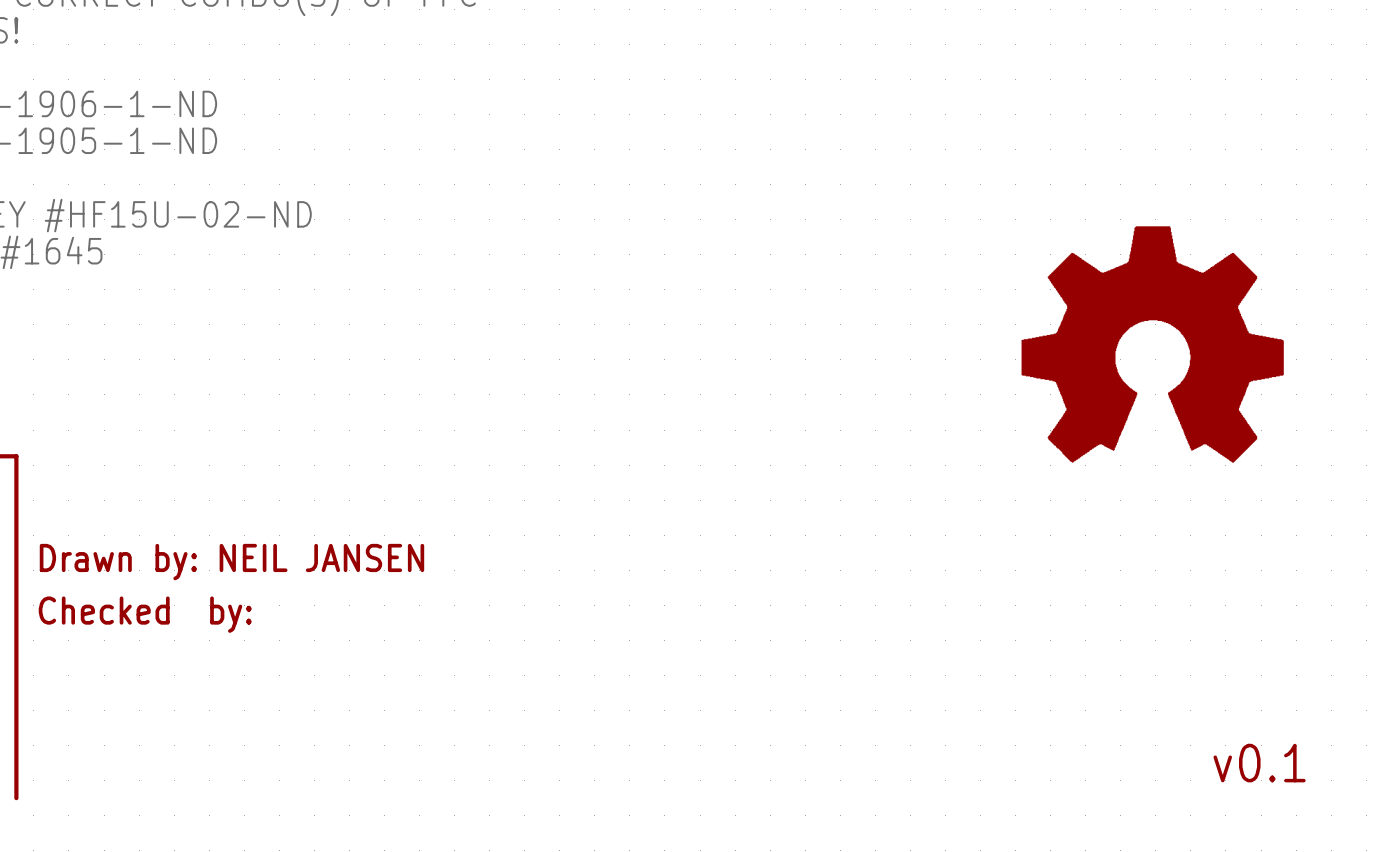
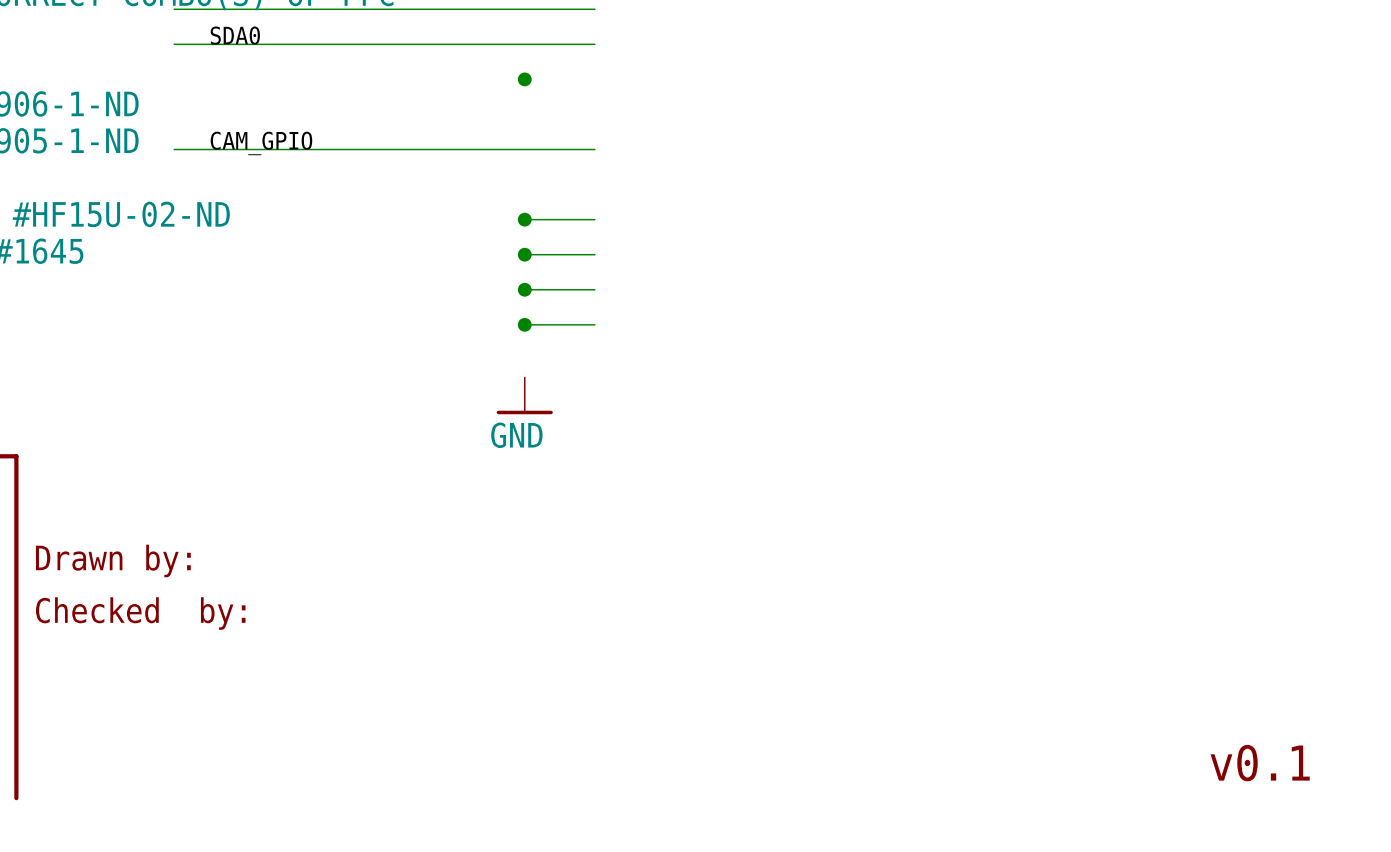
wire: none -> (174, 9) (594, 9)
label: none -> SDA0 (235, 35)
wire: none -> (174, 44) (594, 44)
junction: none -> (524, 79)
label: none -> CAM_GPIO (261, 143)
wire: none -> (174, 149) (594, 149)
wire: none -> (524, 219) (594, 219)
junction: none -> (524, 219)
wire: none -> (524, 254) (594, 254)
junction: none -> (524, 254)
wire: none -> (524, 289) (594, 289)
junction: none -> (524, 289)
wire: none -> (524, 324) (594, 324)
junction: none -> (524, 324)
part: (1152, 344) -> none
power symbol: none -> GND (524, 395)
text: Drawn by: NEIL JANSEN (231, 562) -> Drawn by: (113, 560)

